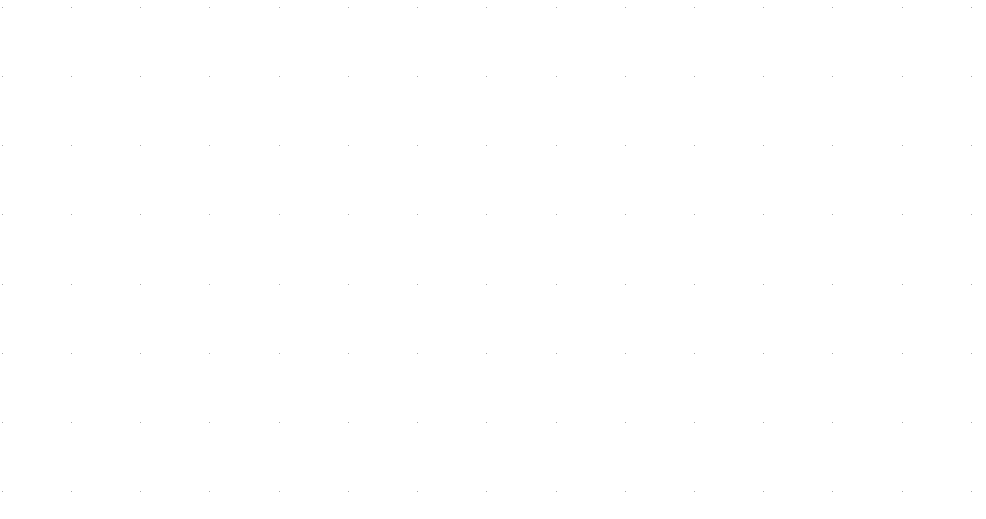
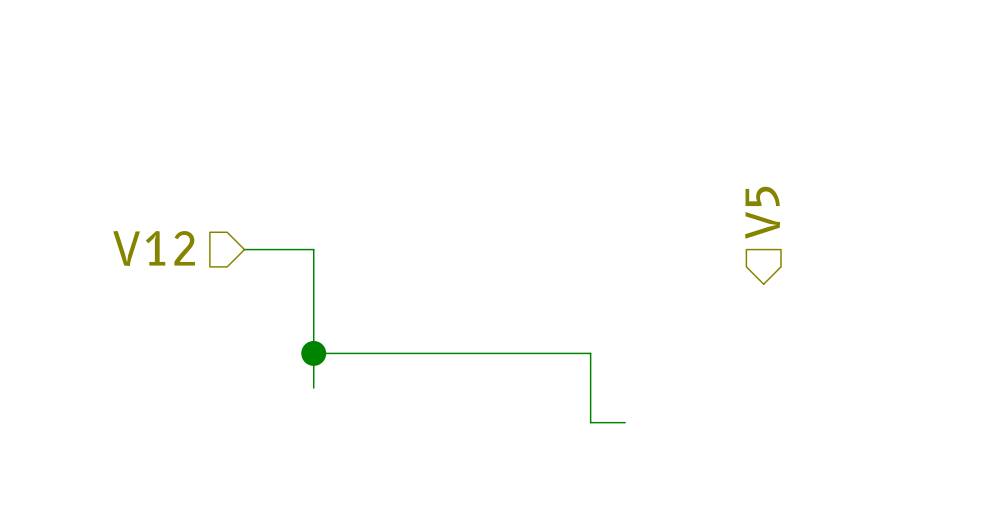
hierarchical label: none -> V5 (762, 212)
hierarchical label: none -> V12 (154, 248)
wire: none -> (244, 249) (313, 249) (313, 388)
wire: none -> (313, 353) (590, 353) (590, 422) (625, 422)
junction: none -> (313, 353)

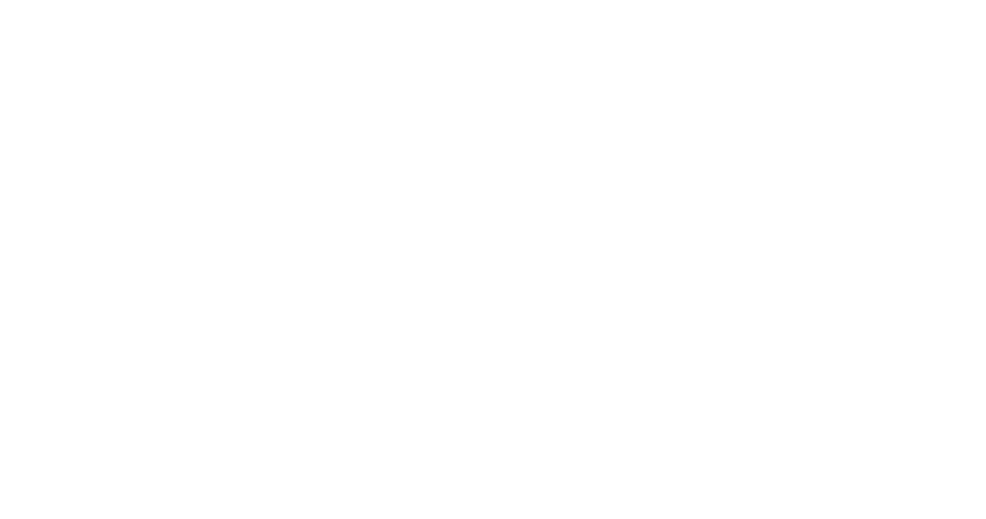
hierarchical label: V5 (762, 212) -> none
hierarchical label: V12 (154, 248) -> none
wire: (244, 249) (313, 249) (313, 388) -> none
wire: (313, 353) (590, 353) (590, 422) (625, 422) -> none
junction: (313, 353) -> none

